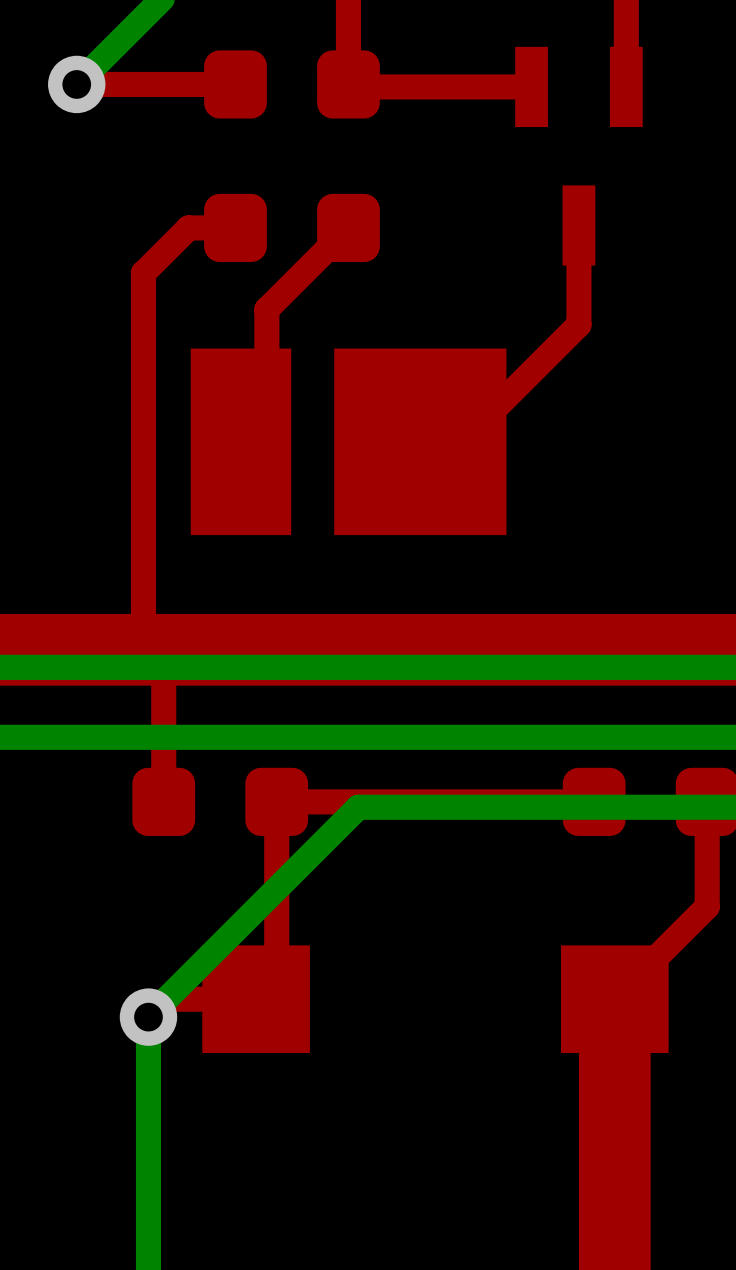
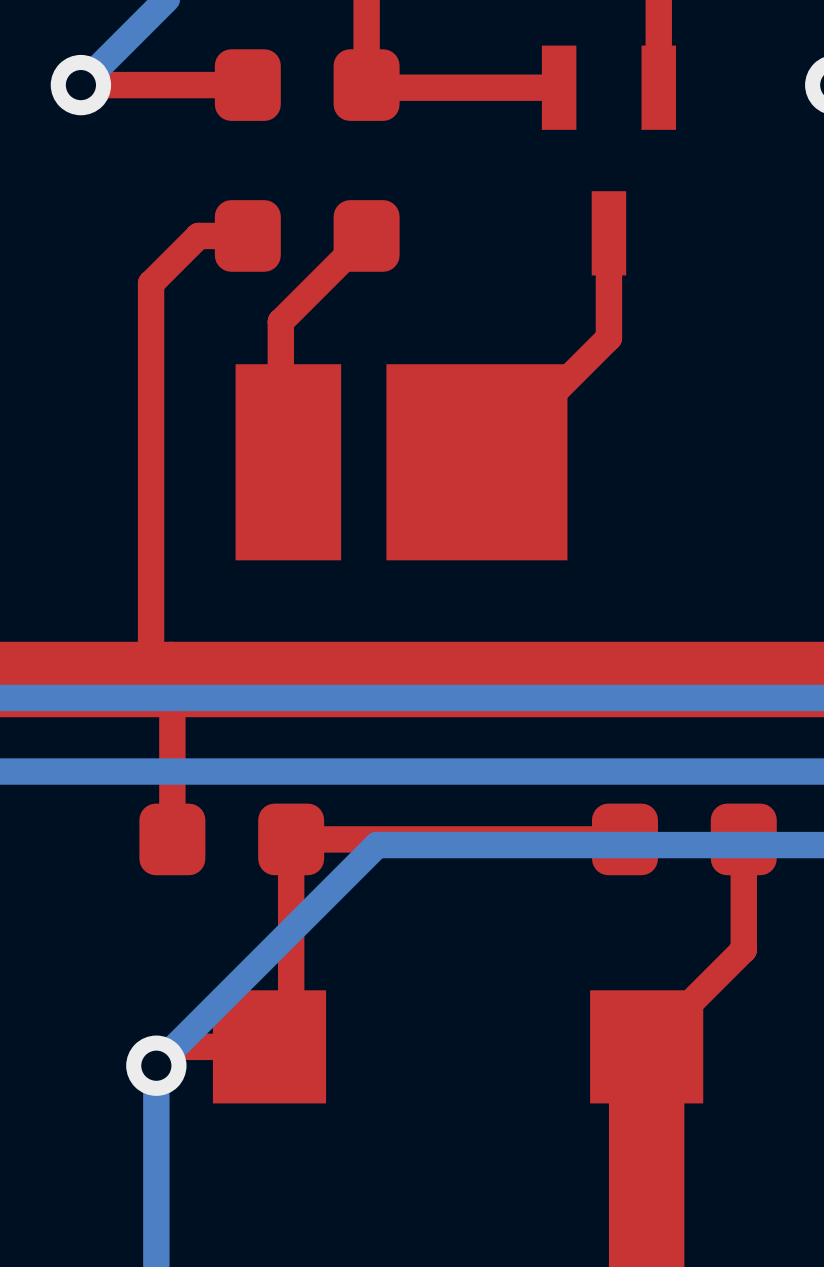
part position: (348, 441) -> (401, 462)

